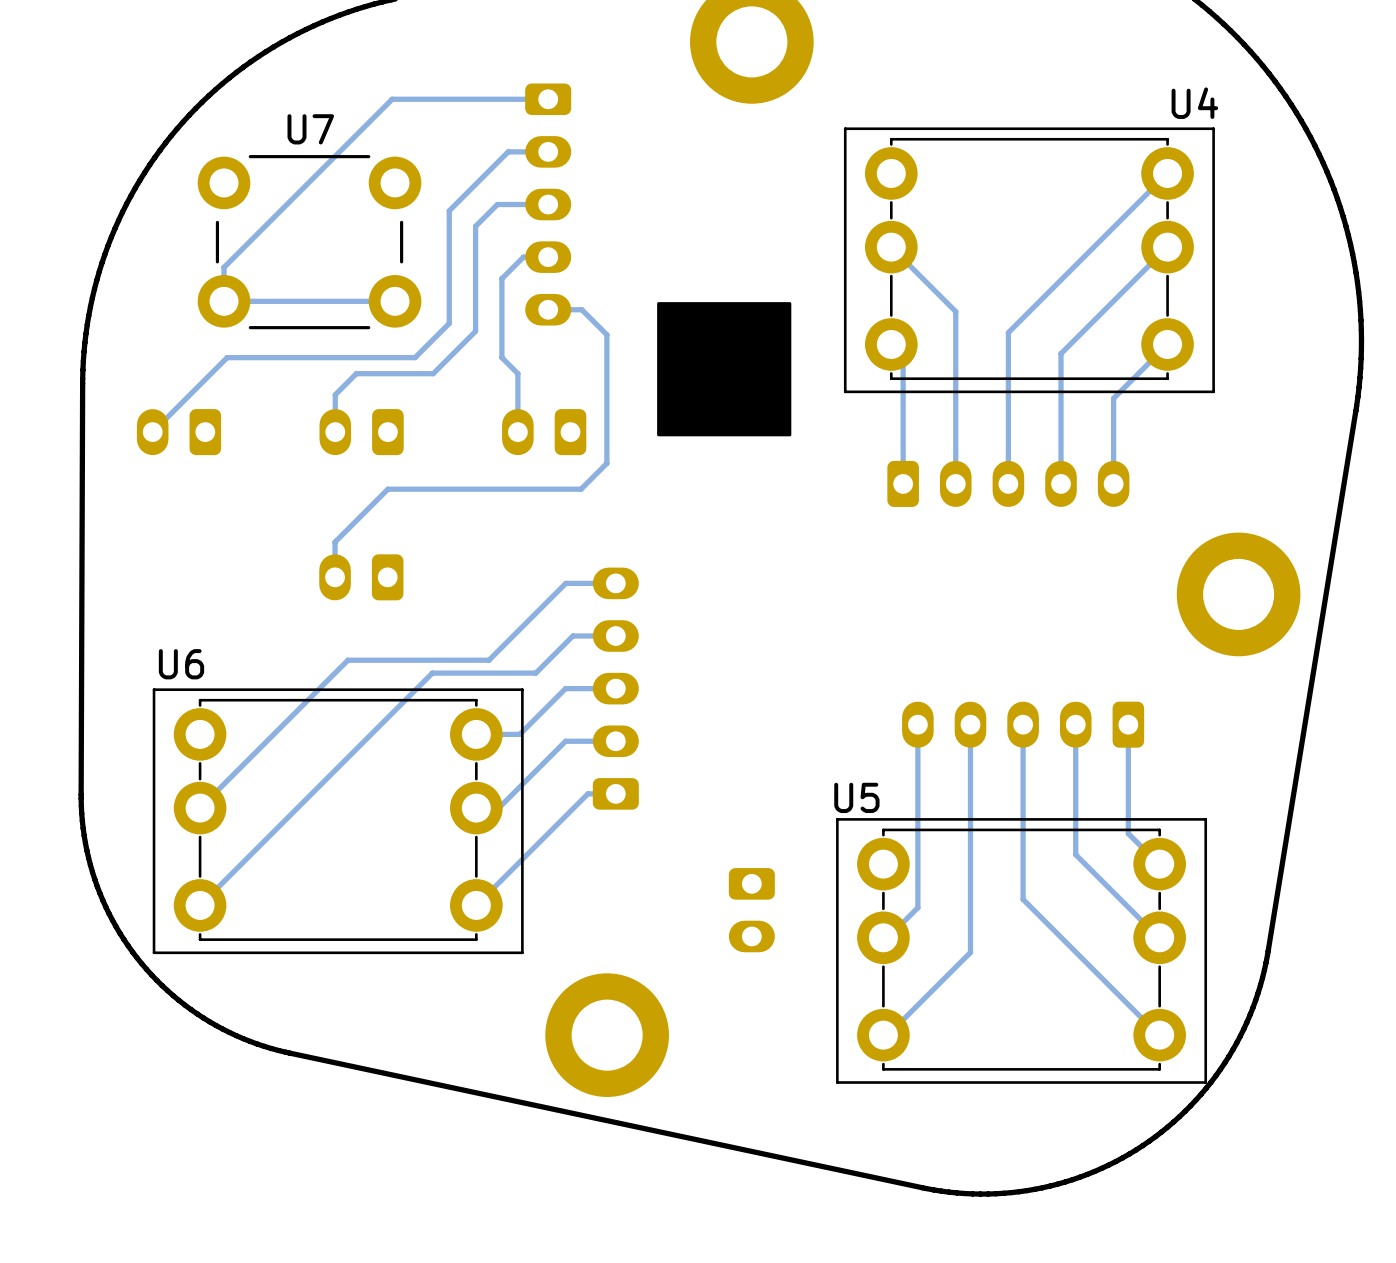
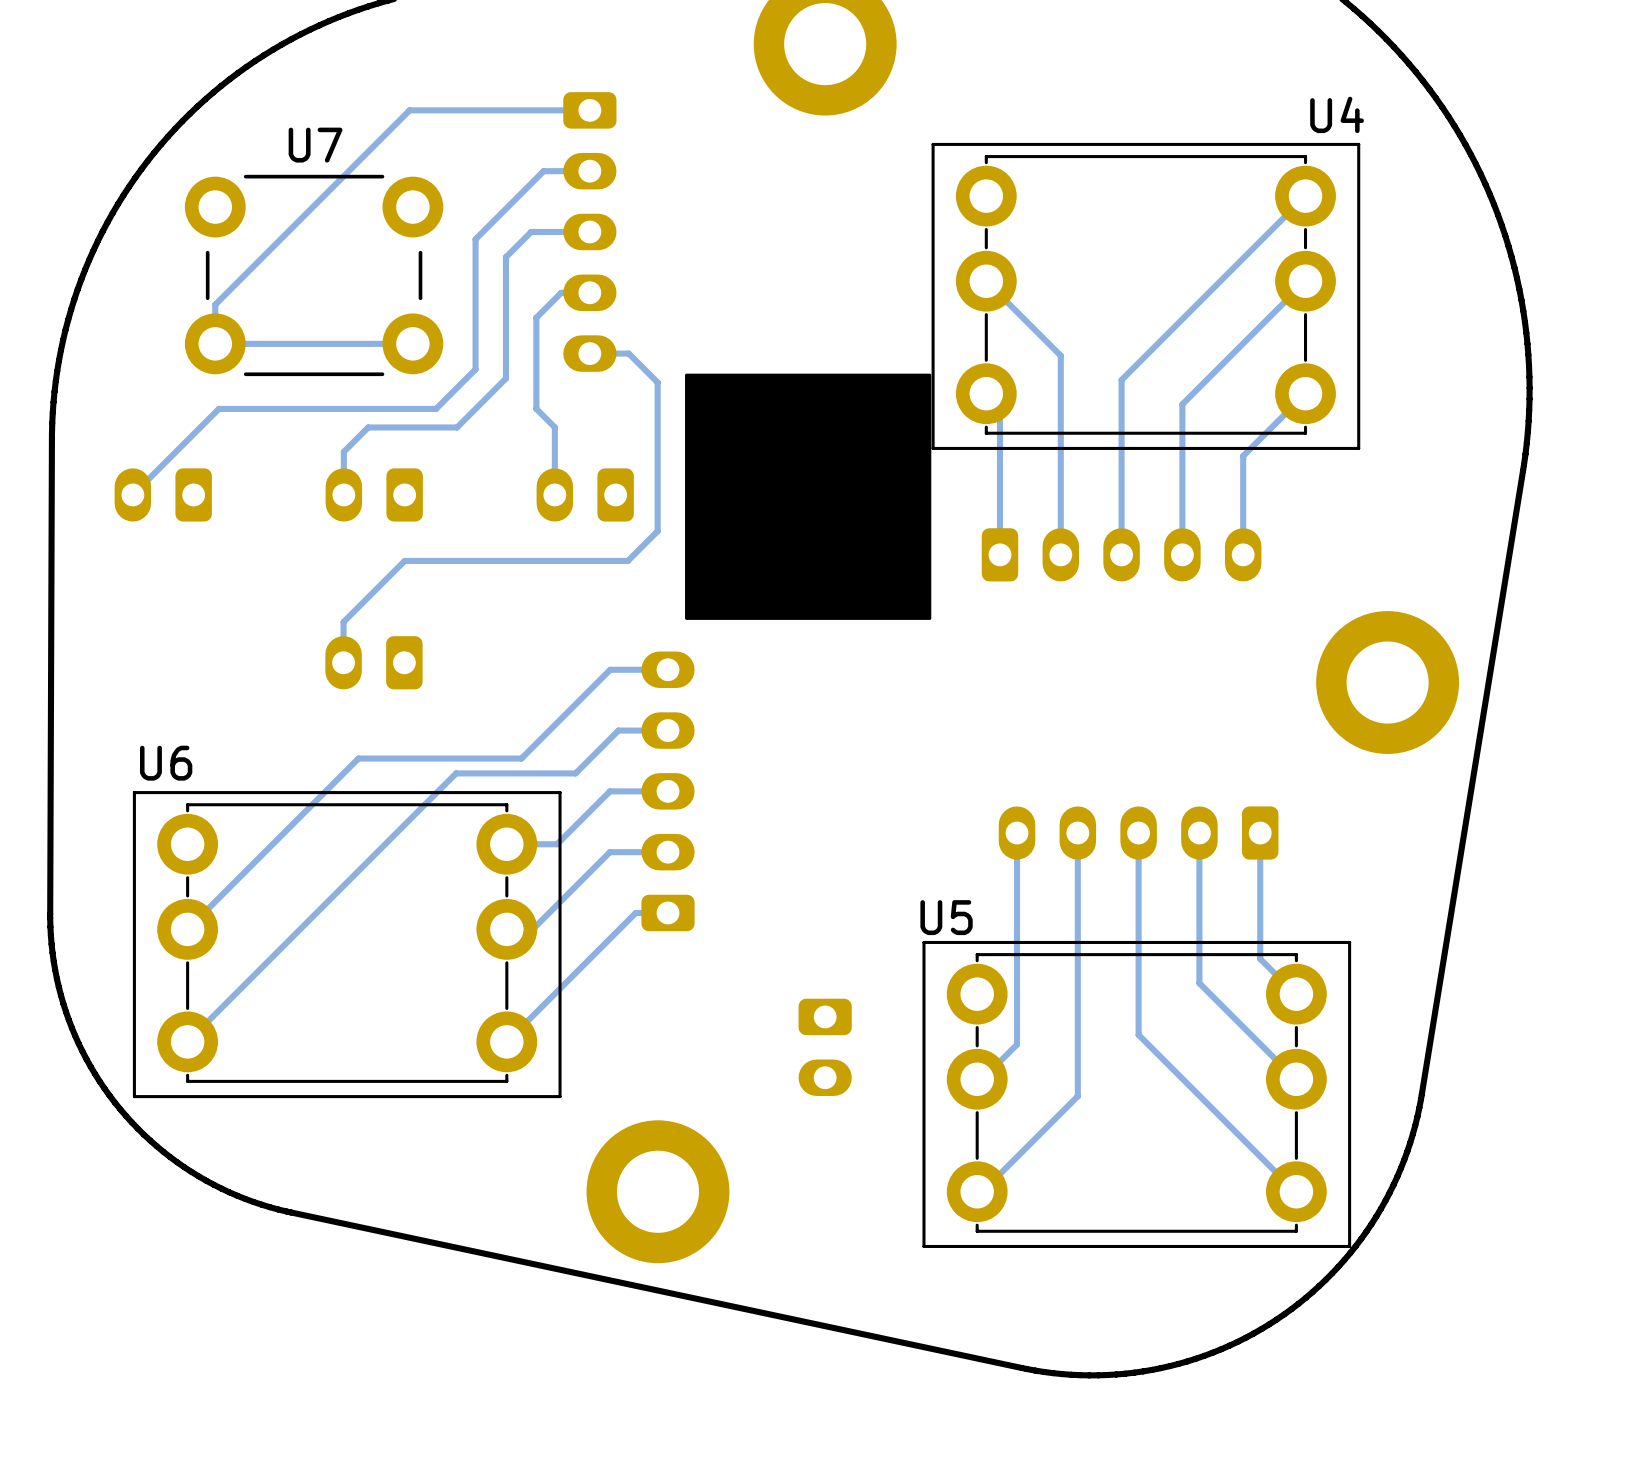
drawing: [657, 302, 792, 437] -> none
drawing: none -> [685, 373, 932, 620]

